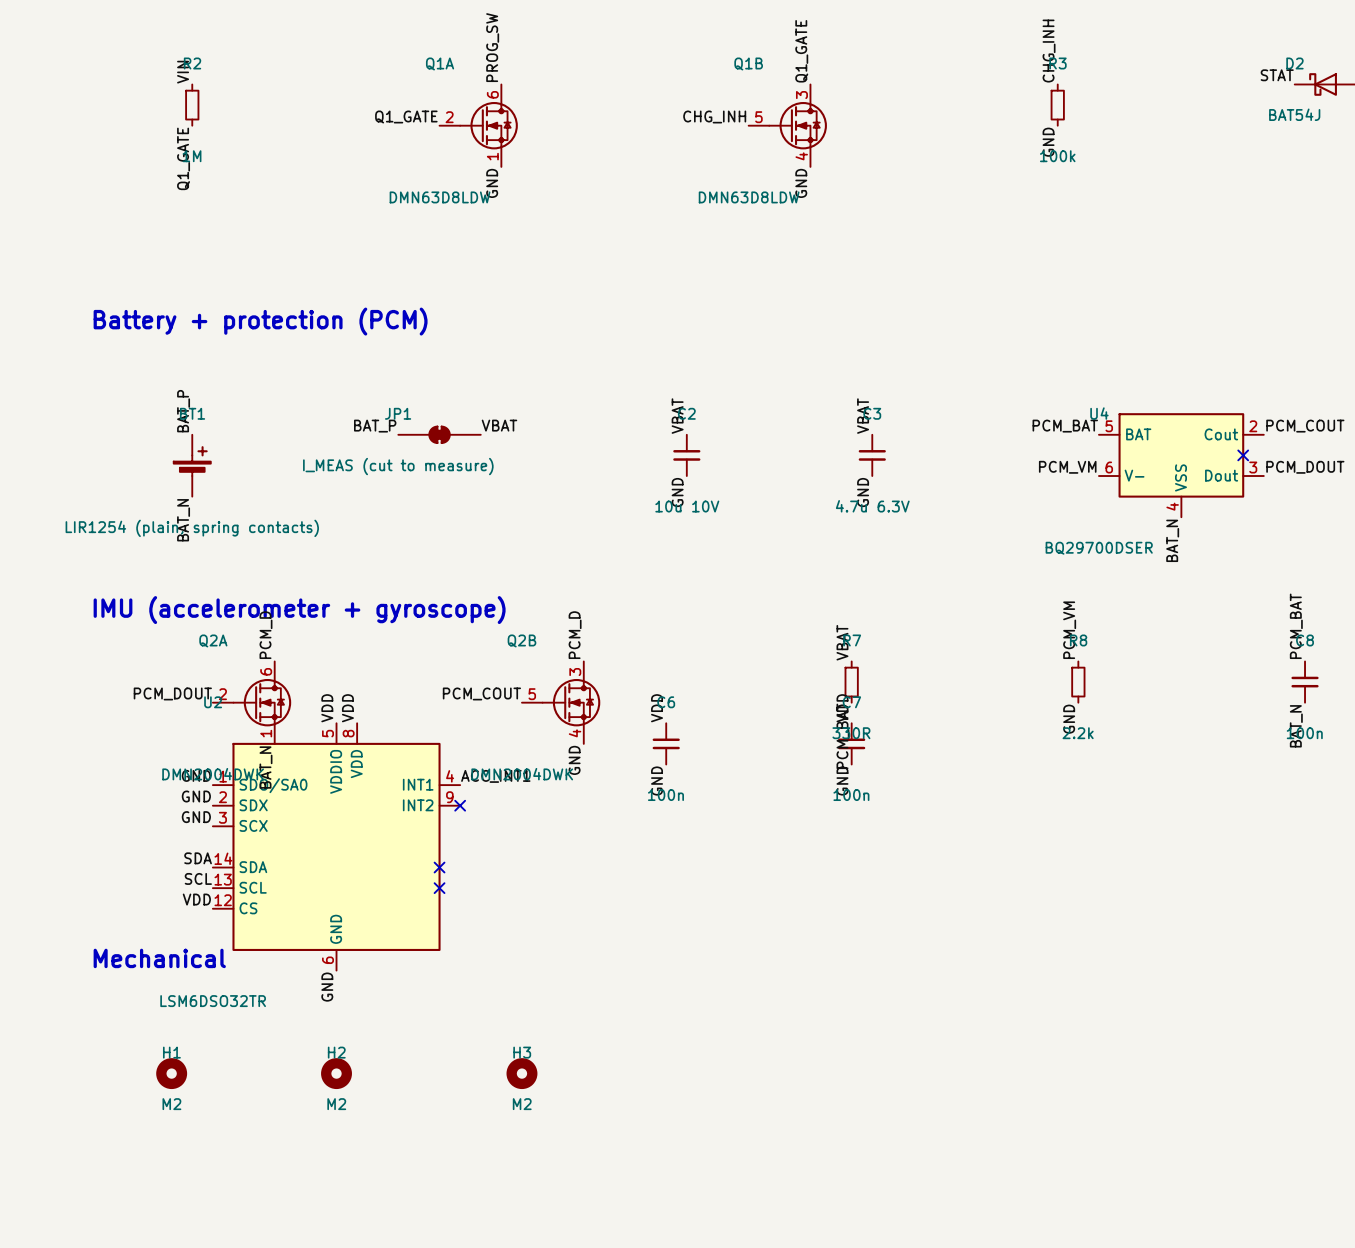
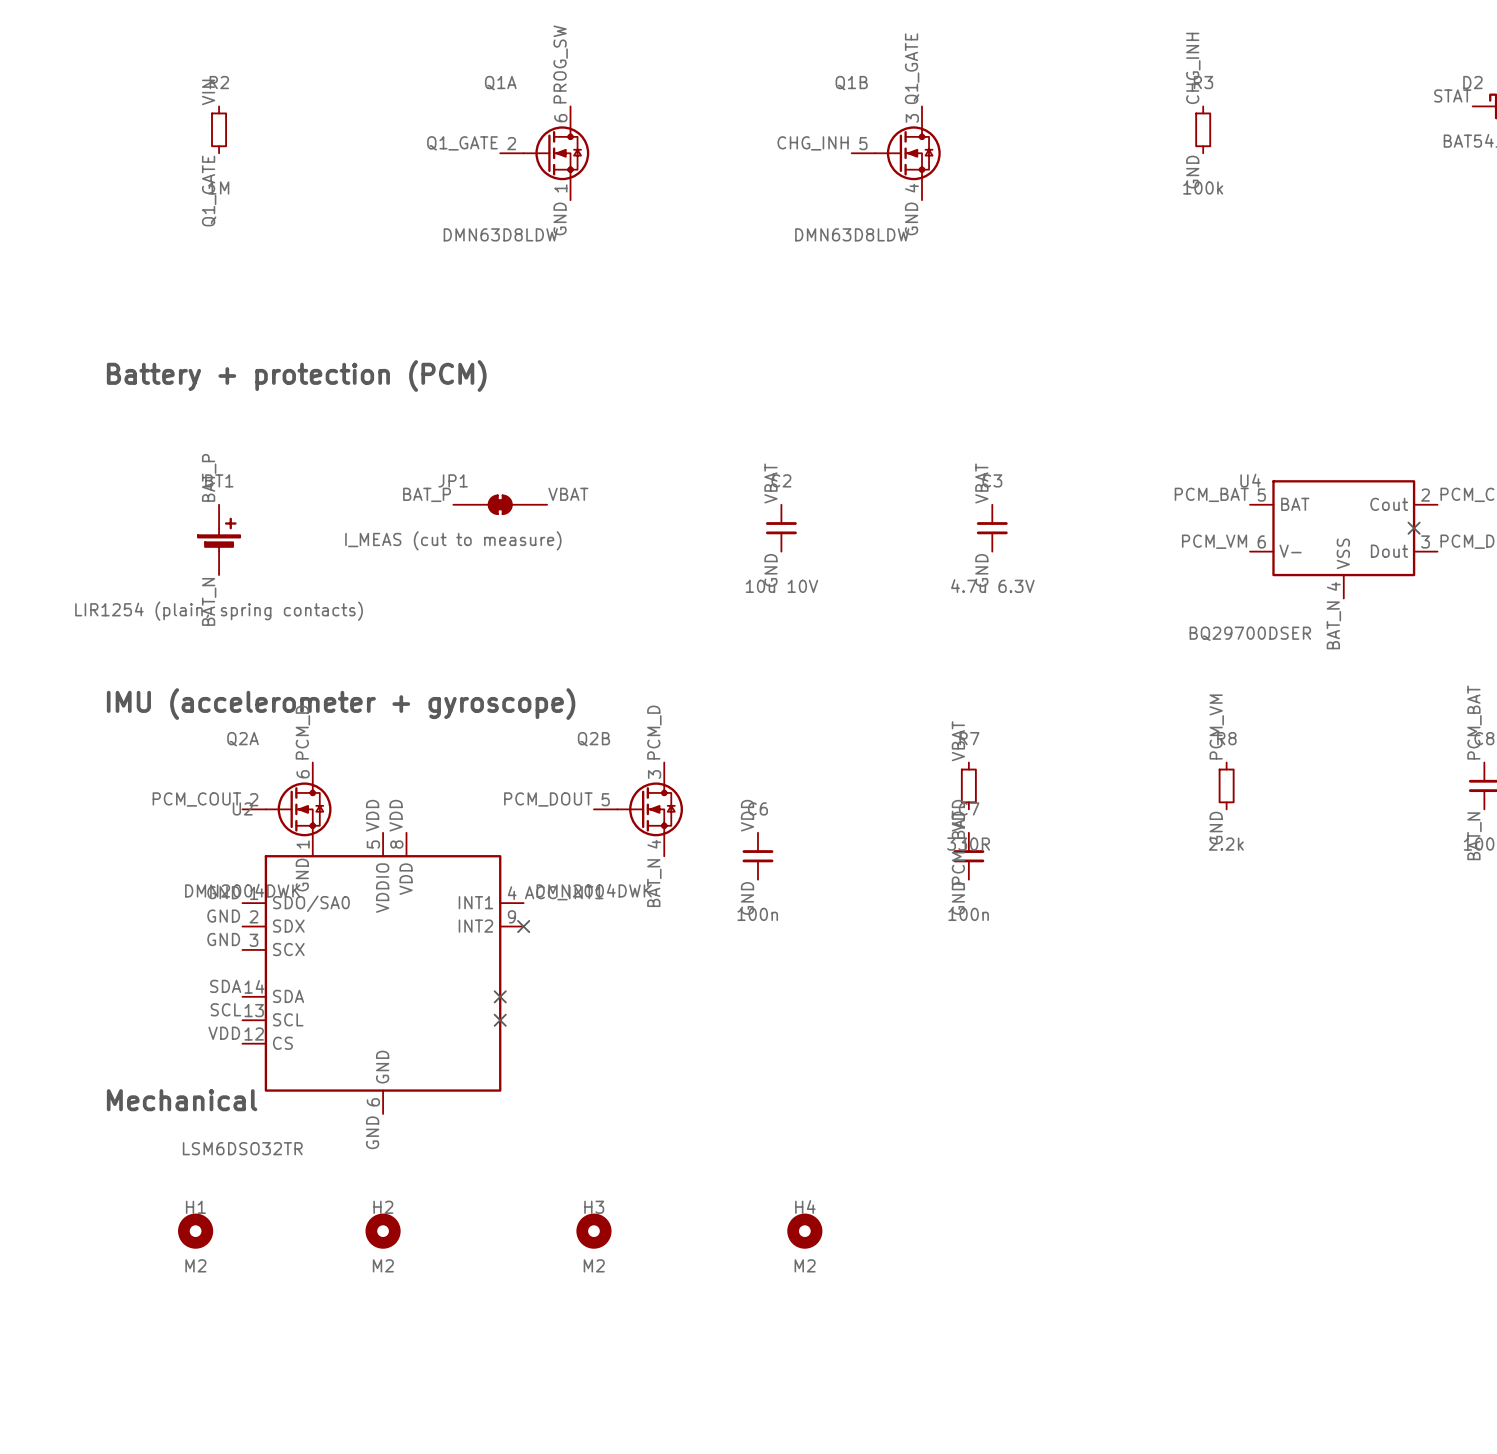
label: PCM_DOUT (172, 693) -> PCM_COUT (196, 799)
label: PCM_COUT (481, 693) -> PCM_DOUT (548, 799)
label: GND (574, 760) -> BAT_N (654, 883)
label: BAT_N (265, 767) -> GND (302, 875)
H4: none -> M2 (804, 1231)

